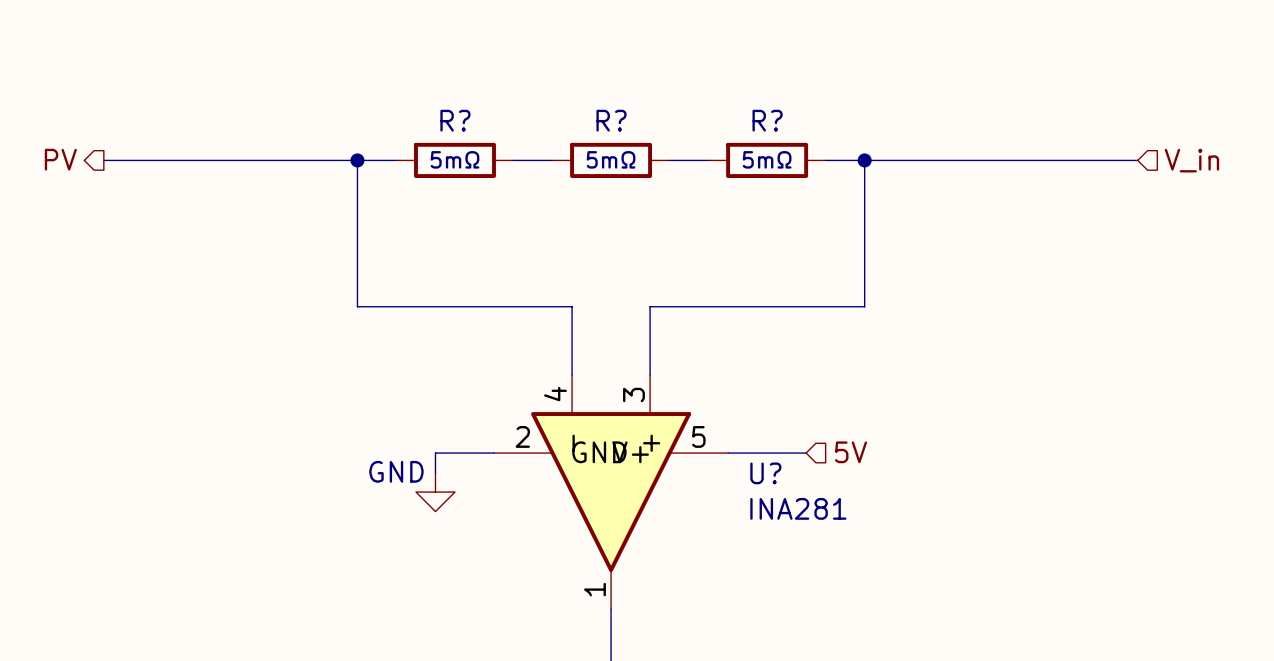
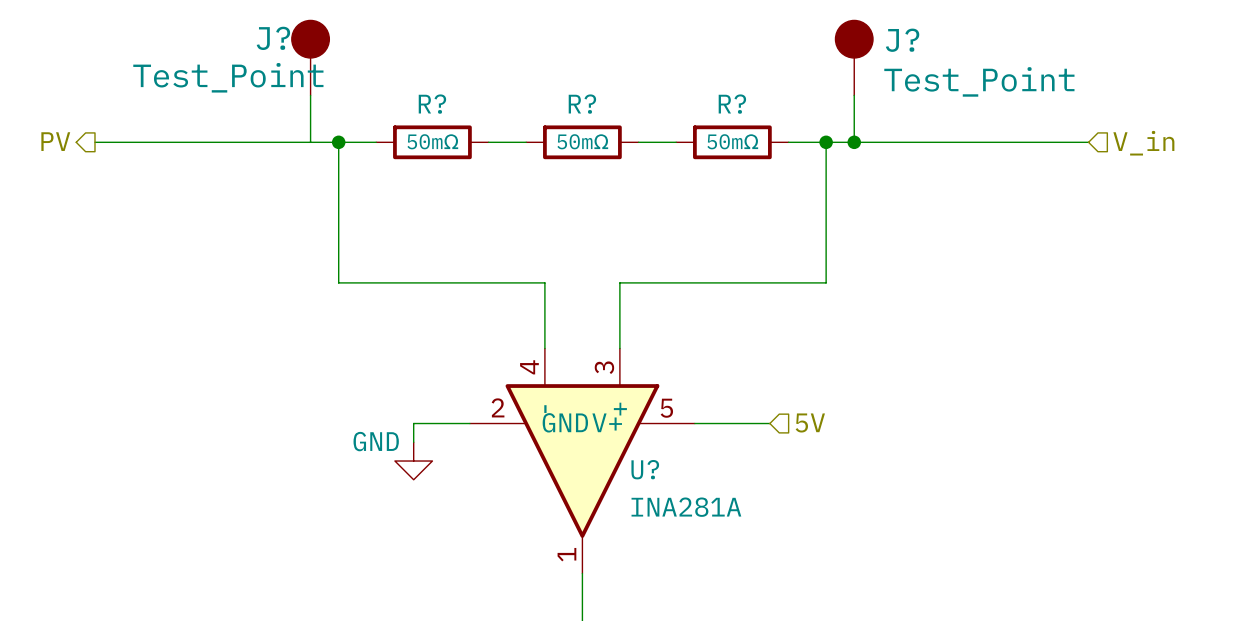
J?: none -> Test_Point (310, 57)
J?: none -> Test_Point (854, 57)
wire: none -> (310, 95) (310, 142)
wire: none -> (854, 95) (854, 142)
R? value: 5mΩ (454, 159) -> 50mΩ (432, 141)
R? value: 5mΩ (611, 159) -> 50mΩ (582, 141)
R? value: 5mΩ (767, 159) -> 50mΩ (732, 141)
junction: none -> (854, 142)
U? name position: U? (765, 473) -> U? (645, 469)
U? value: INA281 (798, 508) -> INA281A (686, 507)

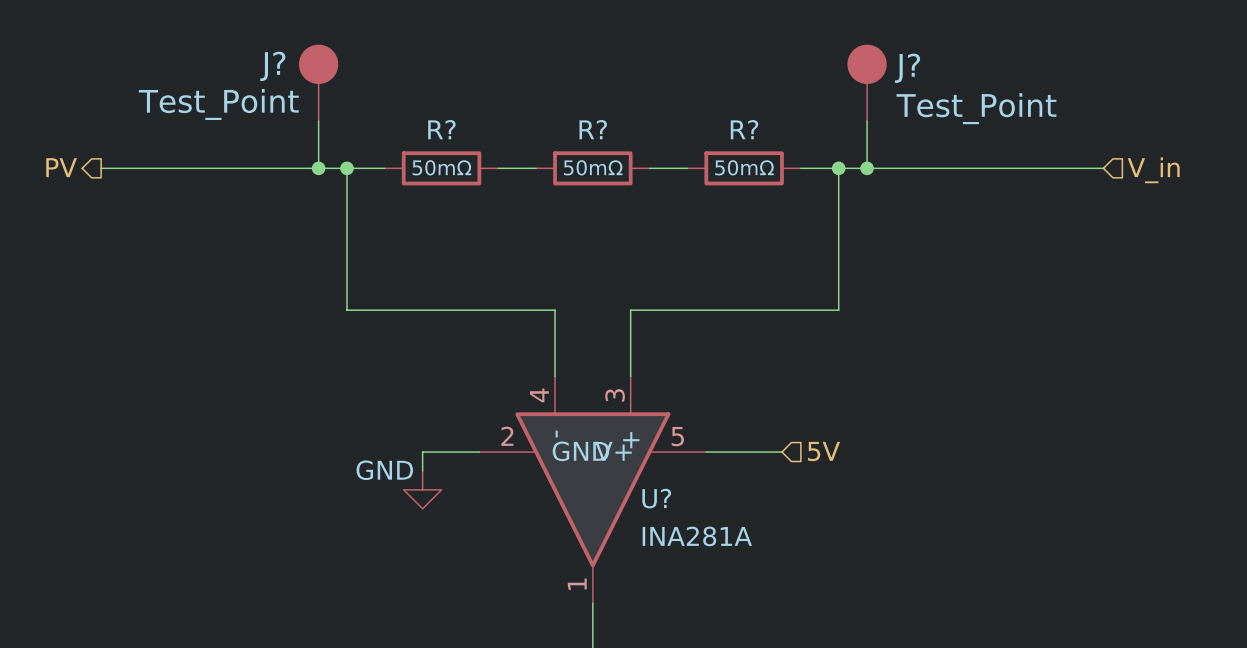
junction: none -> (318, 168)

